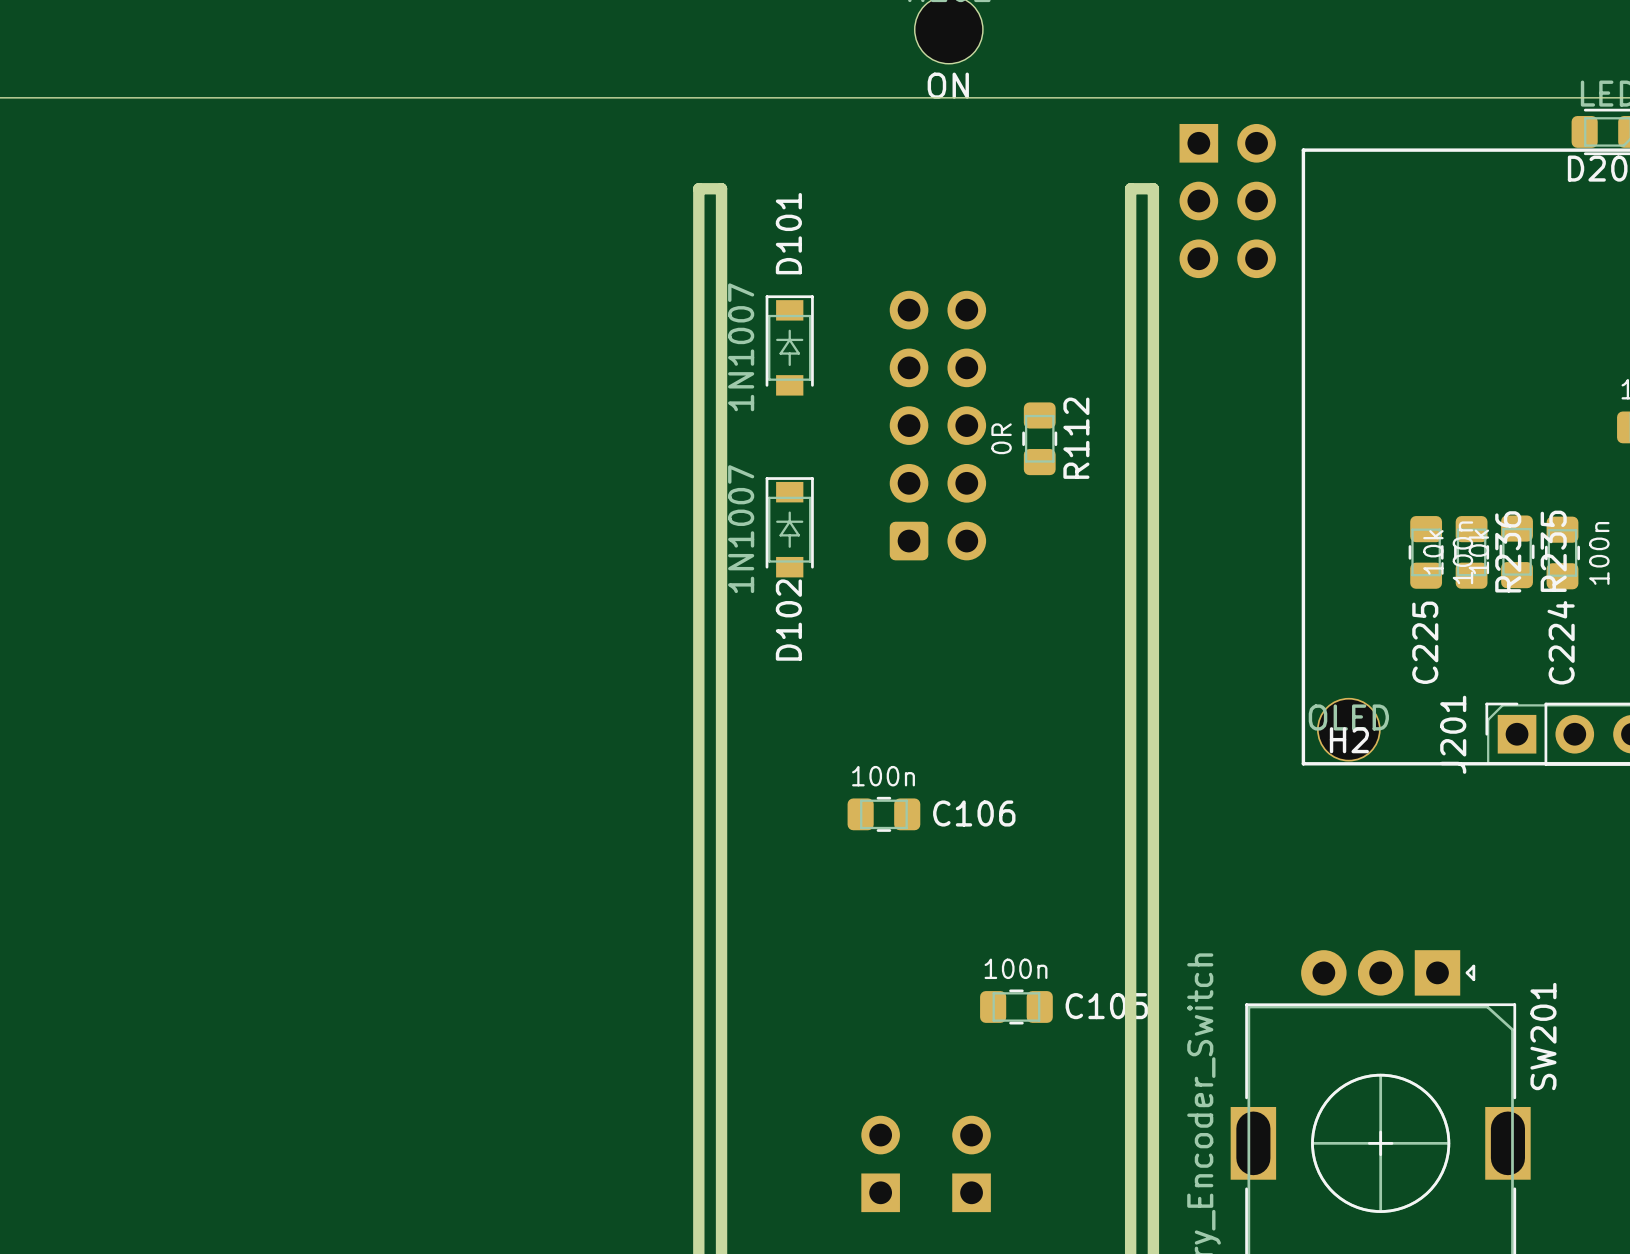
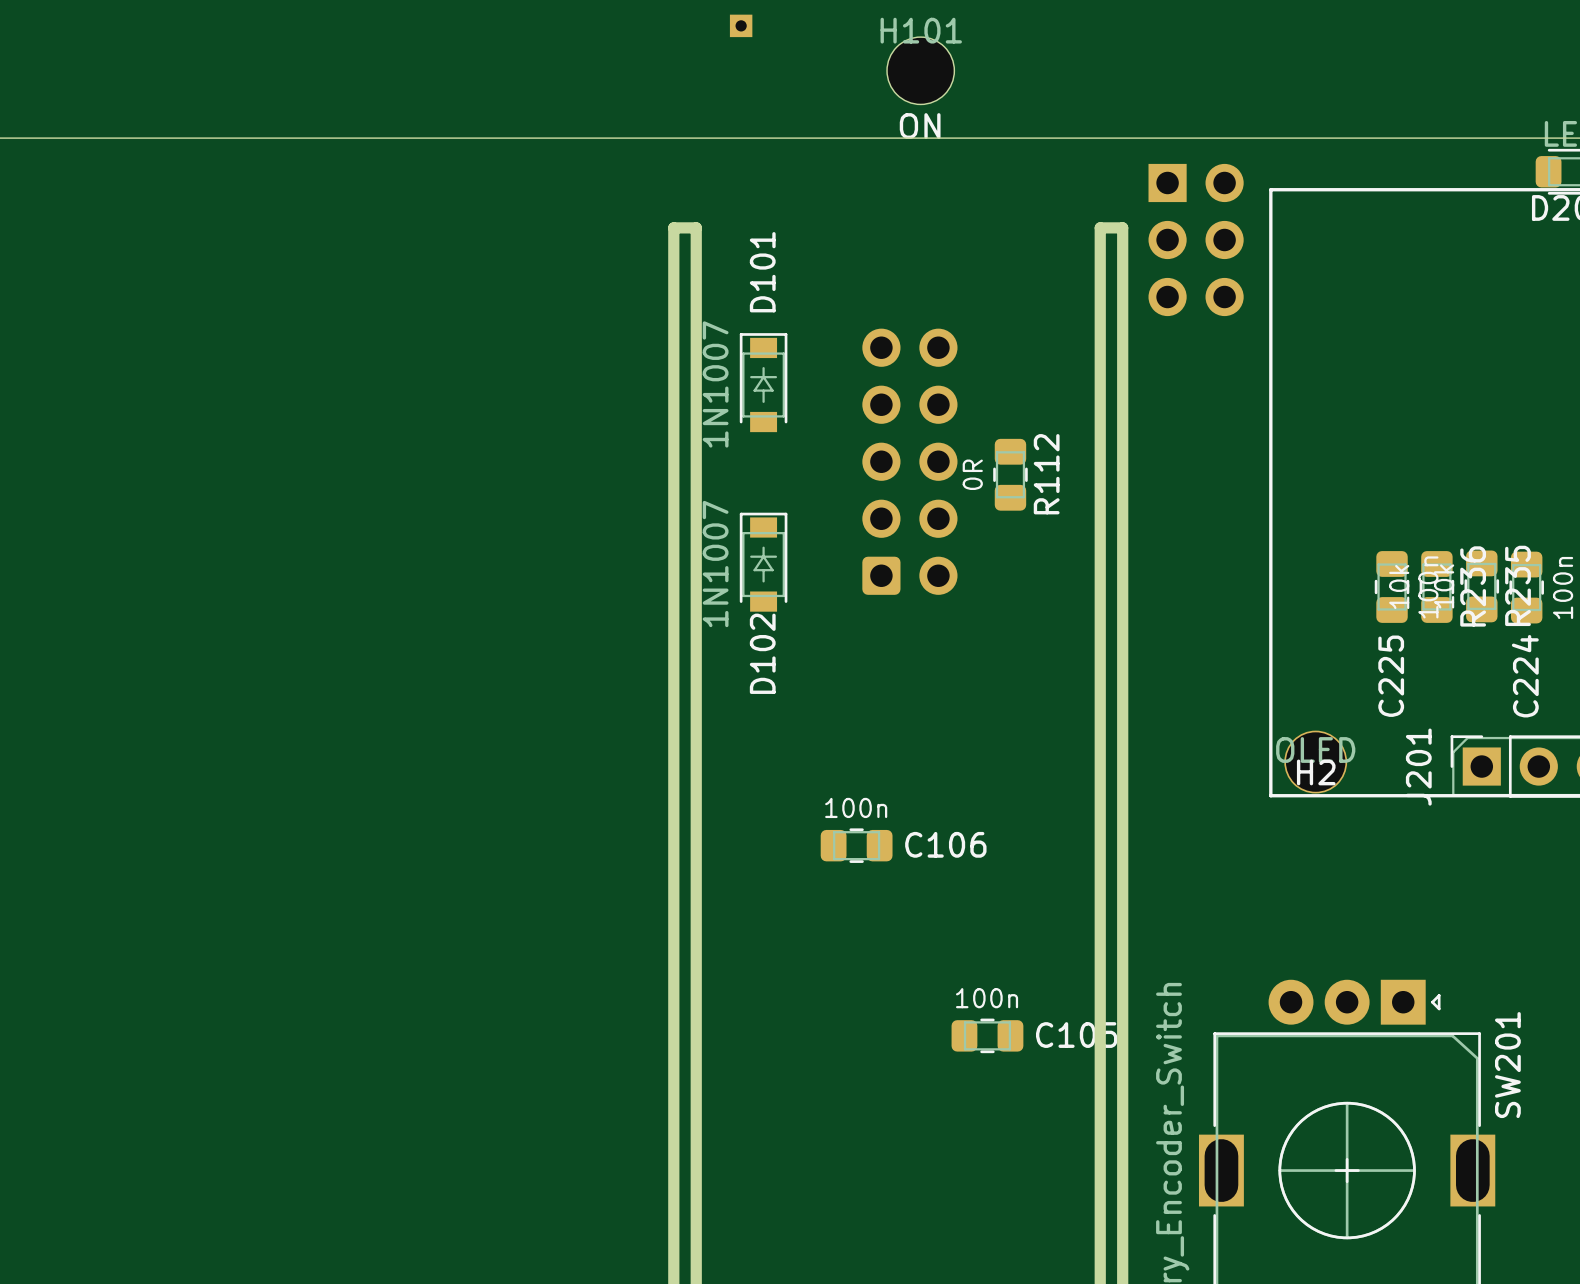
part: (880, 1163) -> none
part: (971, 1163) -> none

